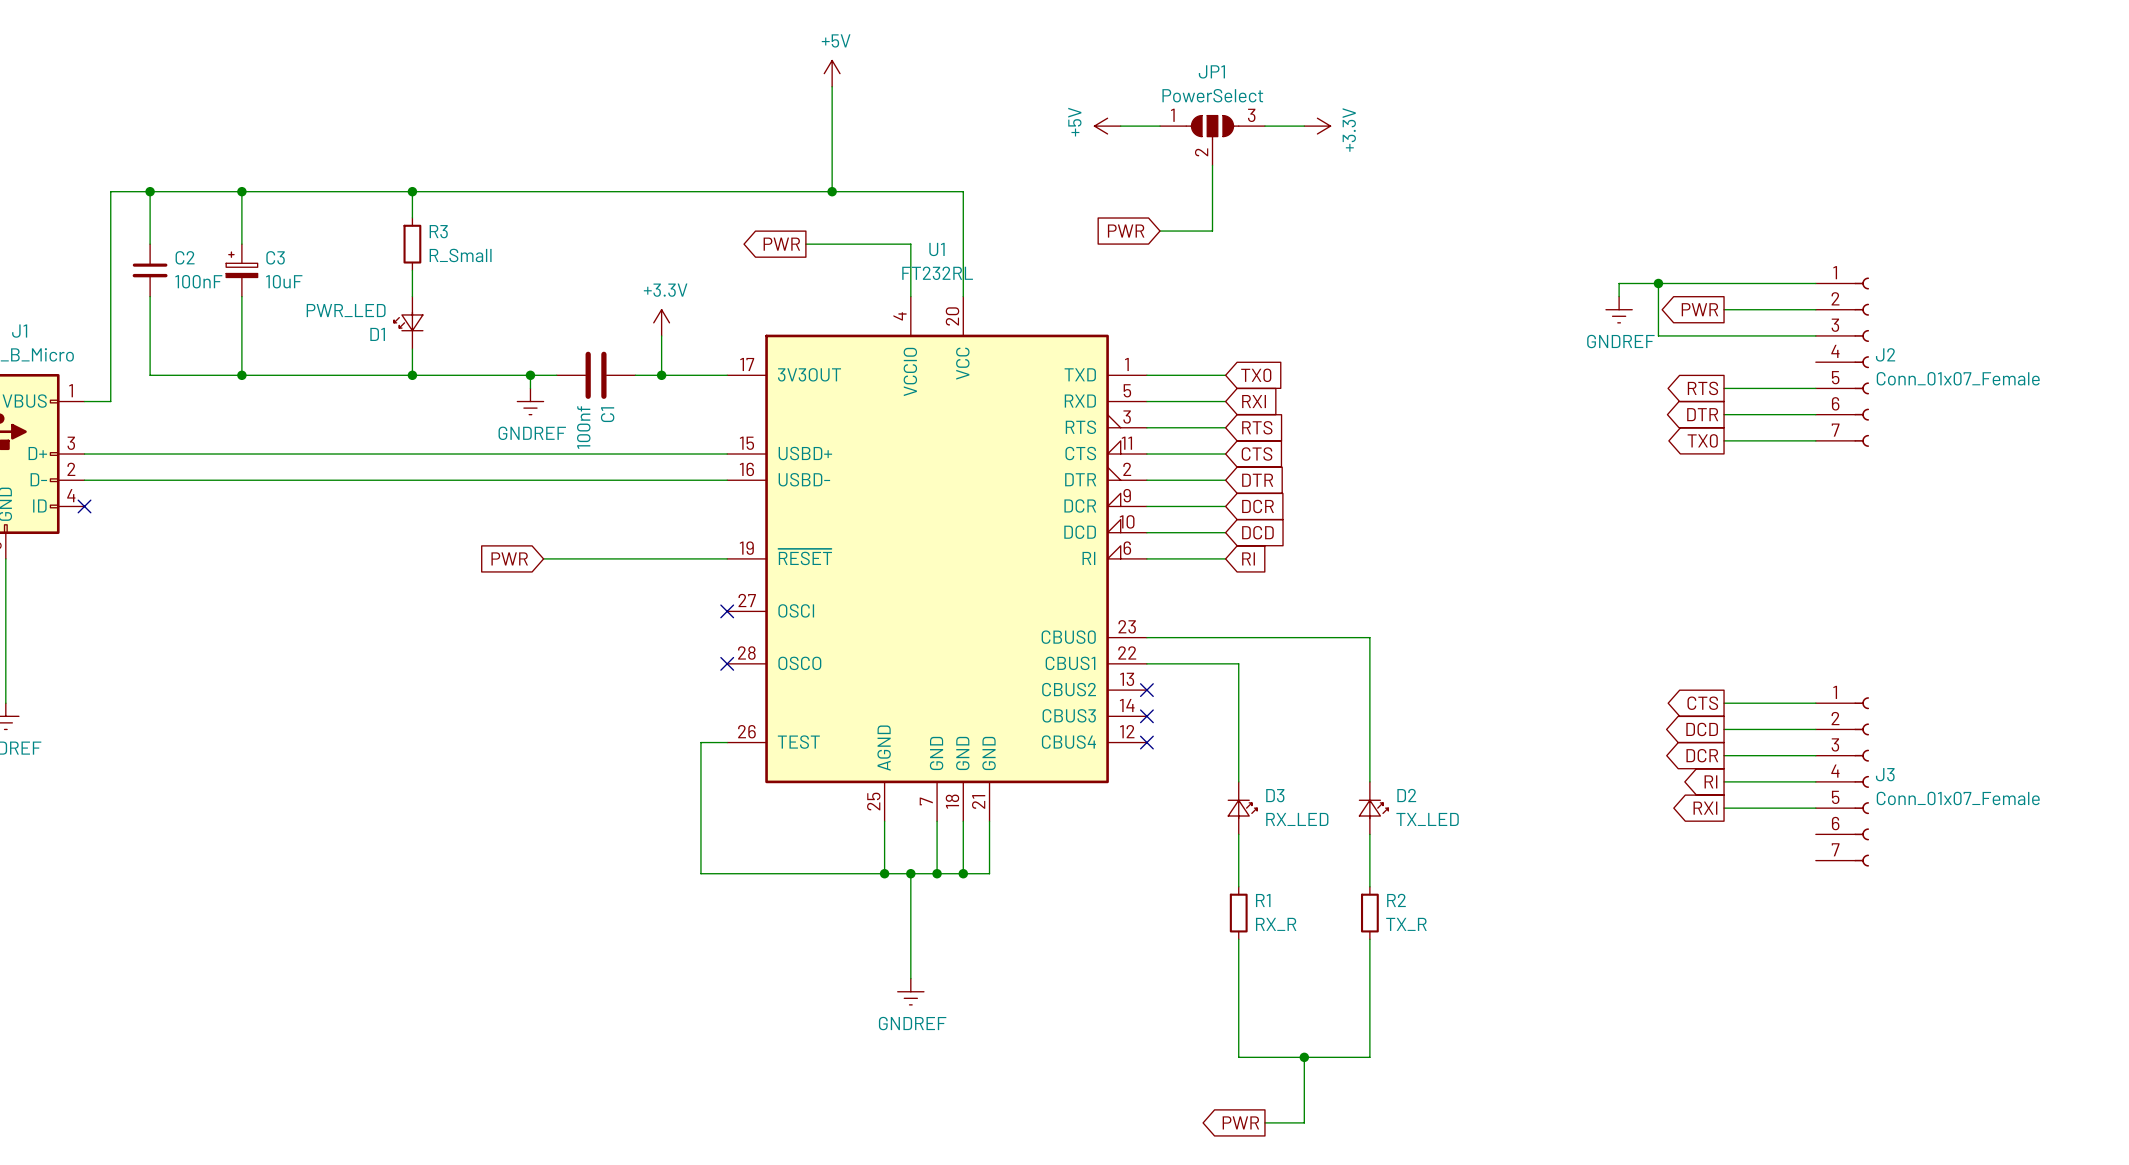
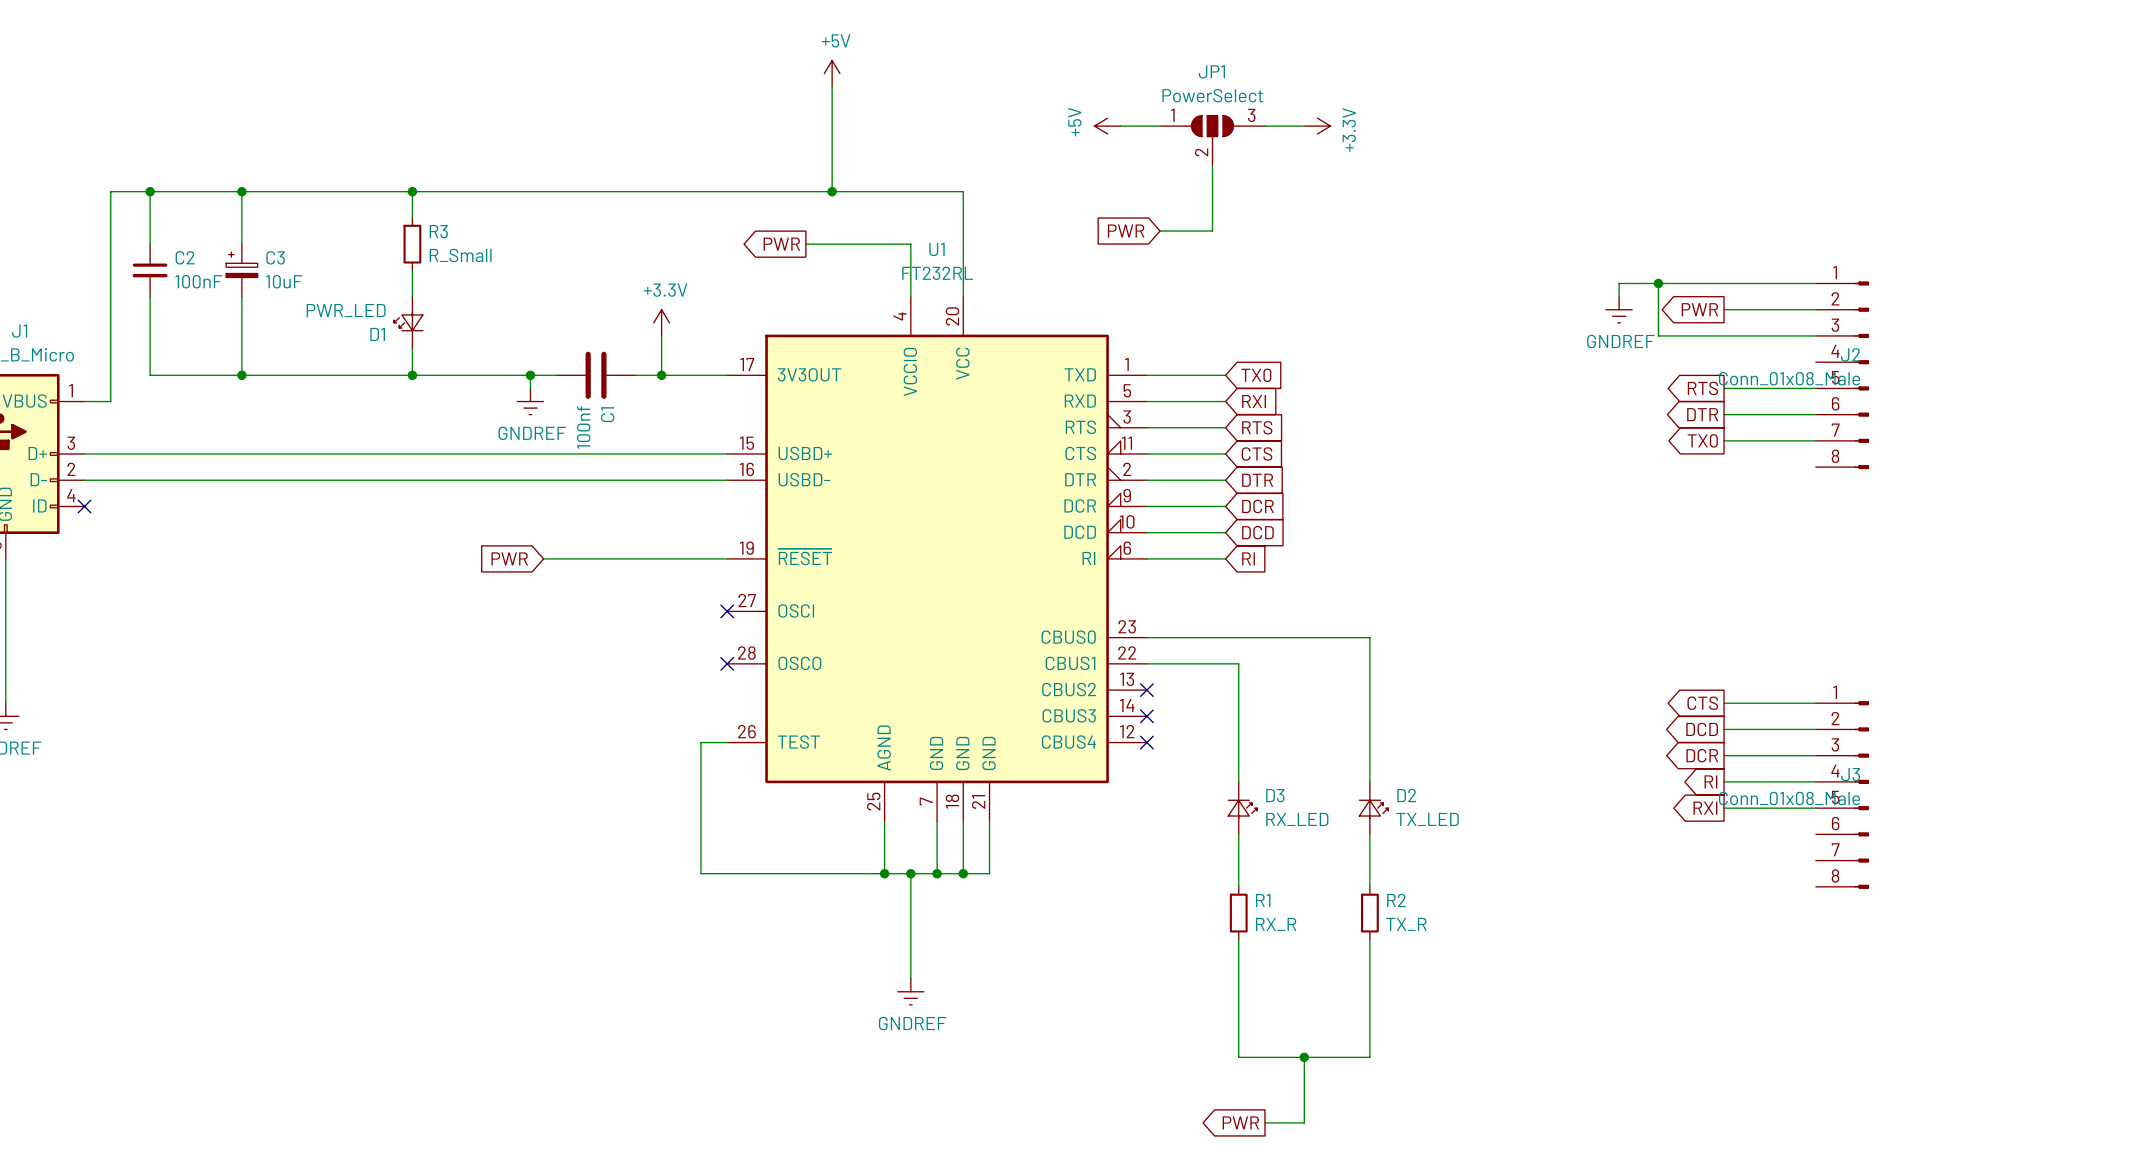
J2 symbol: [1815, 277, 1870, 447] -> [1815, 281, 1870, 470]
J2 name position: J2 (1885, 354) -> J2 (1850, 354)
J2 value: Conn_01x07_Female (1958, 378) -> Conn_01x08_Male (1789, 378)
J3 symbol: [1815, 697, 1870, 867] -> [1815, 701, 1870, 889]
J3 name position: J3 (1885, 774) -> J3 (1850, 774)
J3 value: Conn_01x07_Female (1958, 798) -> Conn_01x08_Male (1789, 798)

